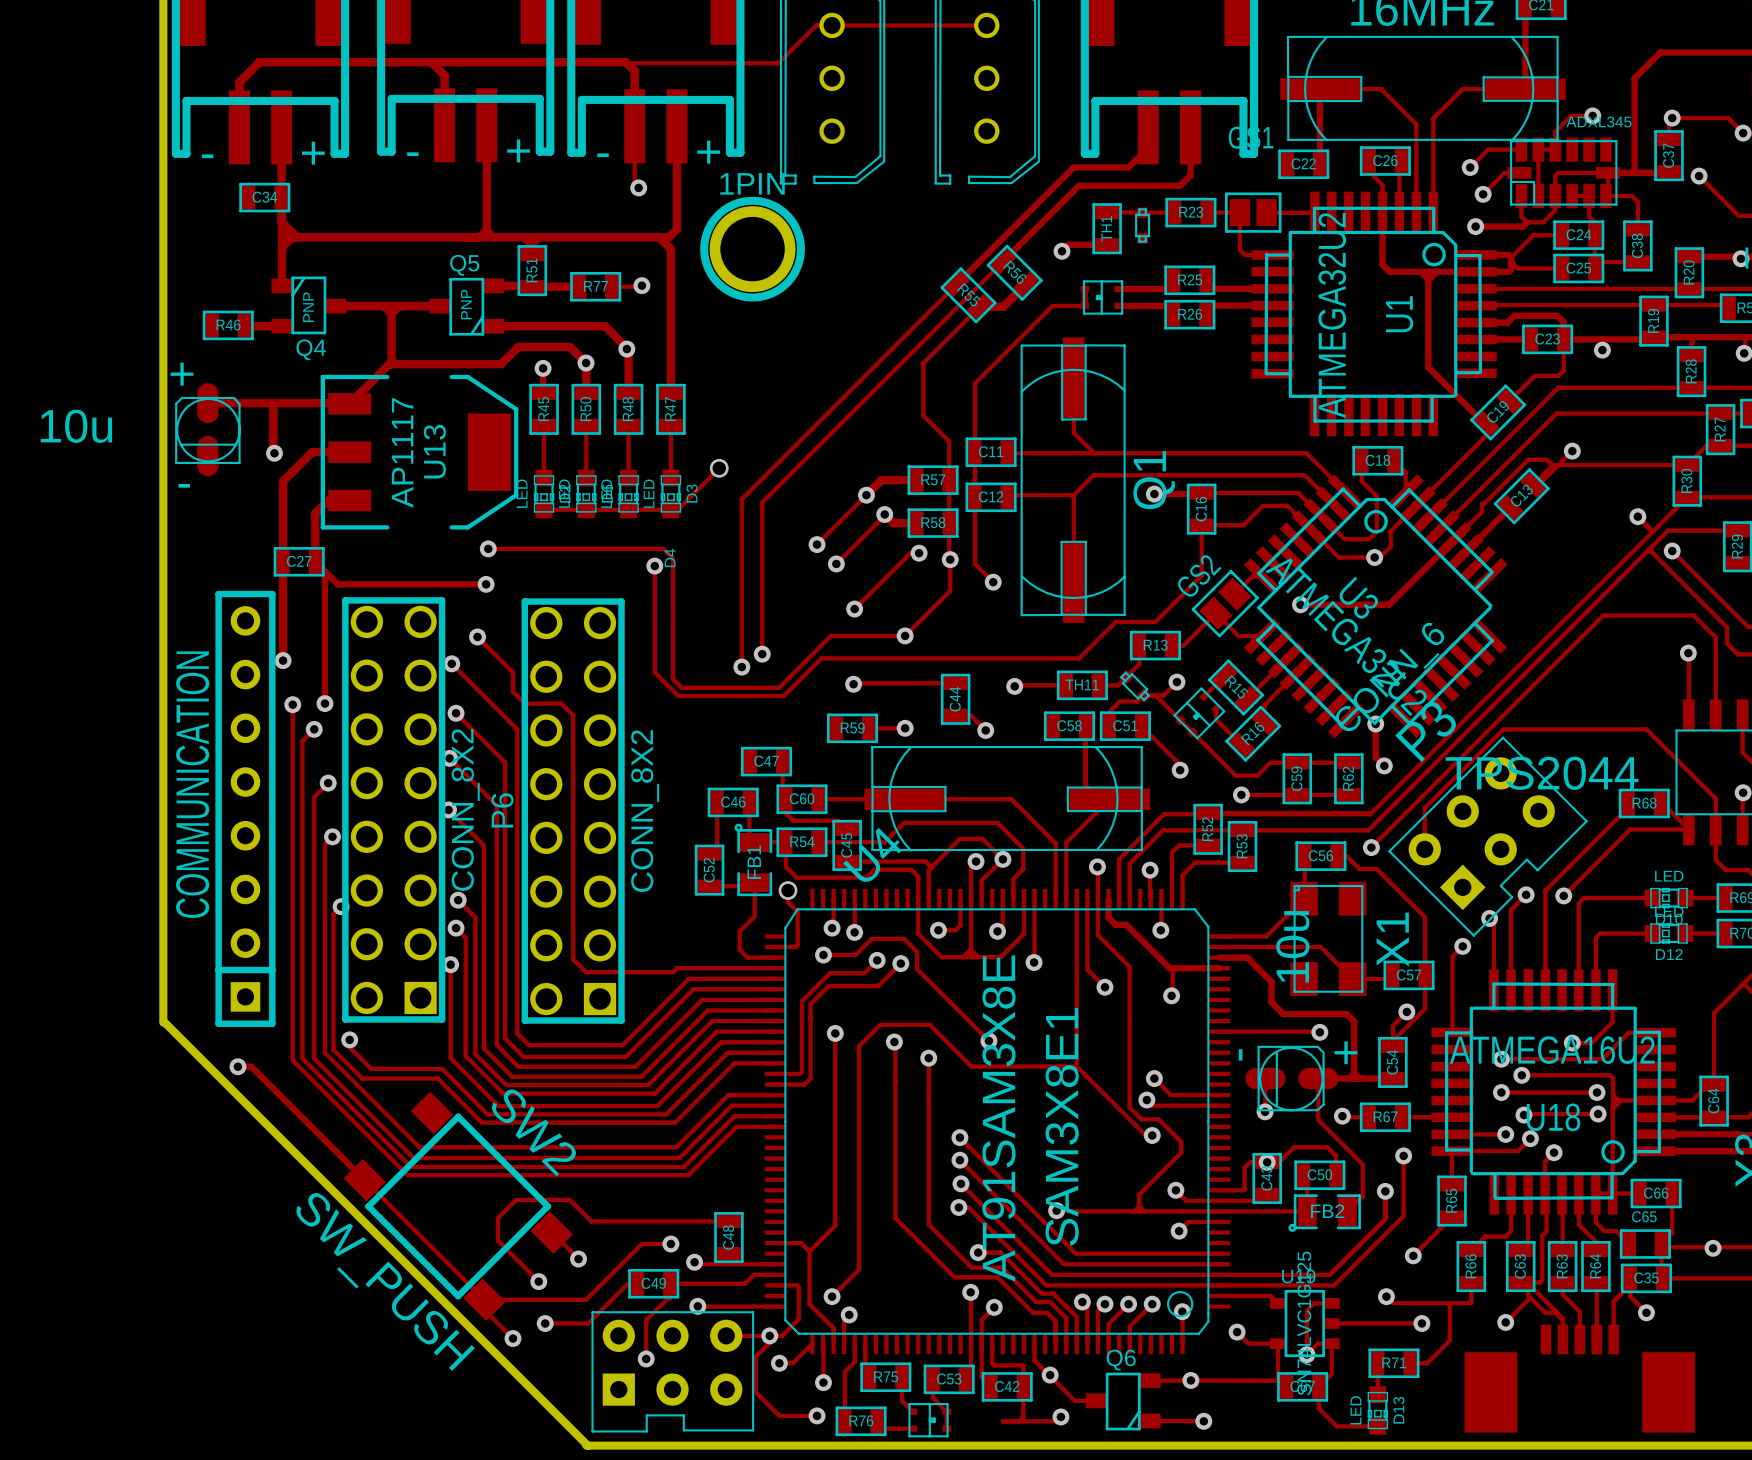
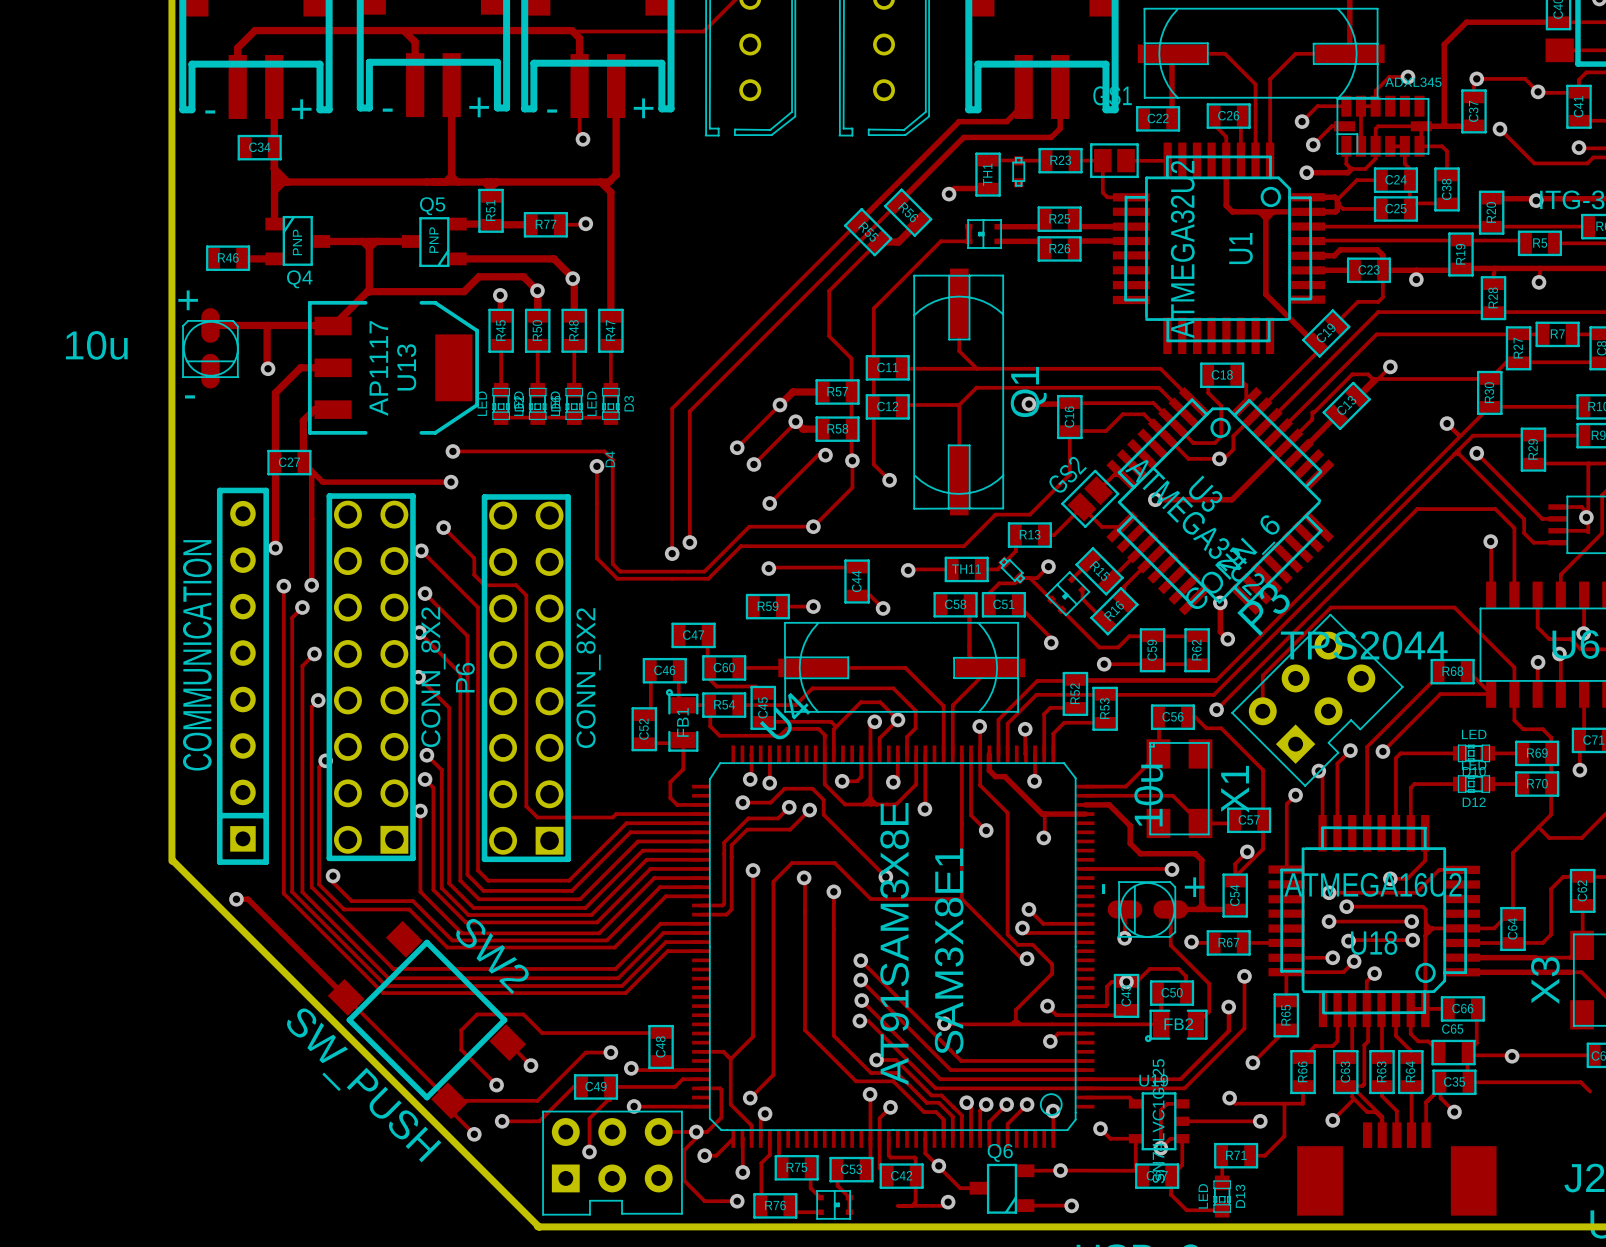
1PIN: (752, 249) -> none
track: (719, 468) (677, 509) (670, 509) -> none
via: (719, 468) -> none
track: (788, 890) (788, 902) (797, 912) (797, 945) (795, 947) (775, 947) -> none
via: (788, 890) -> none

